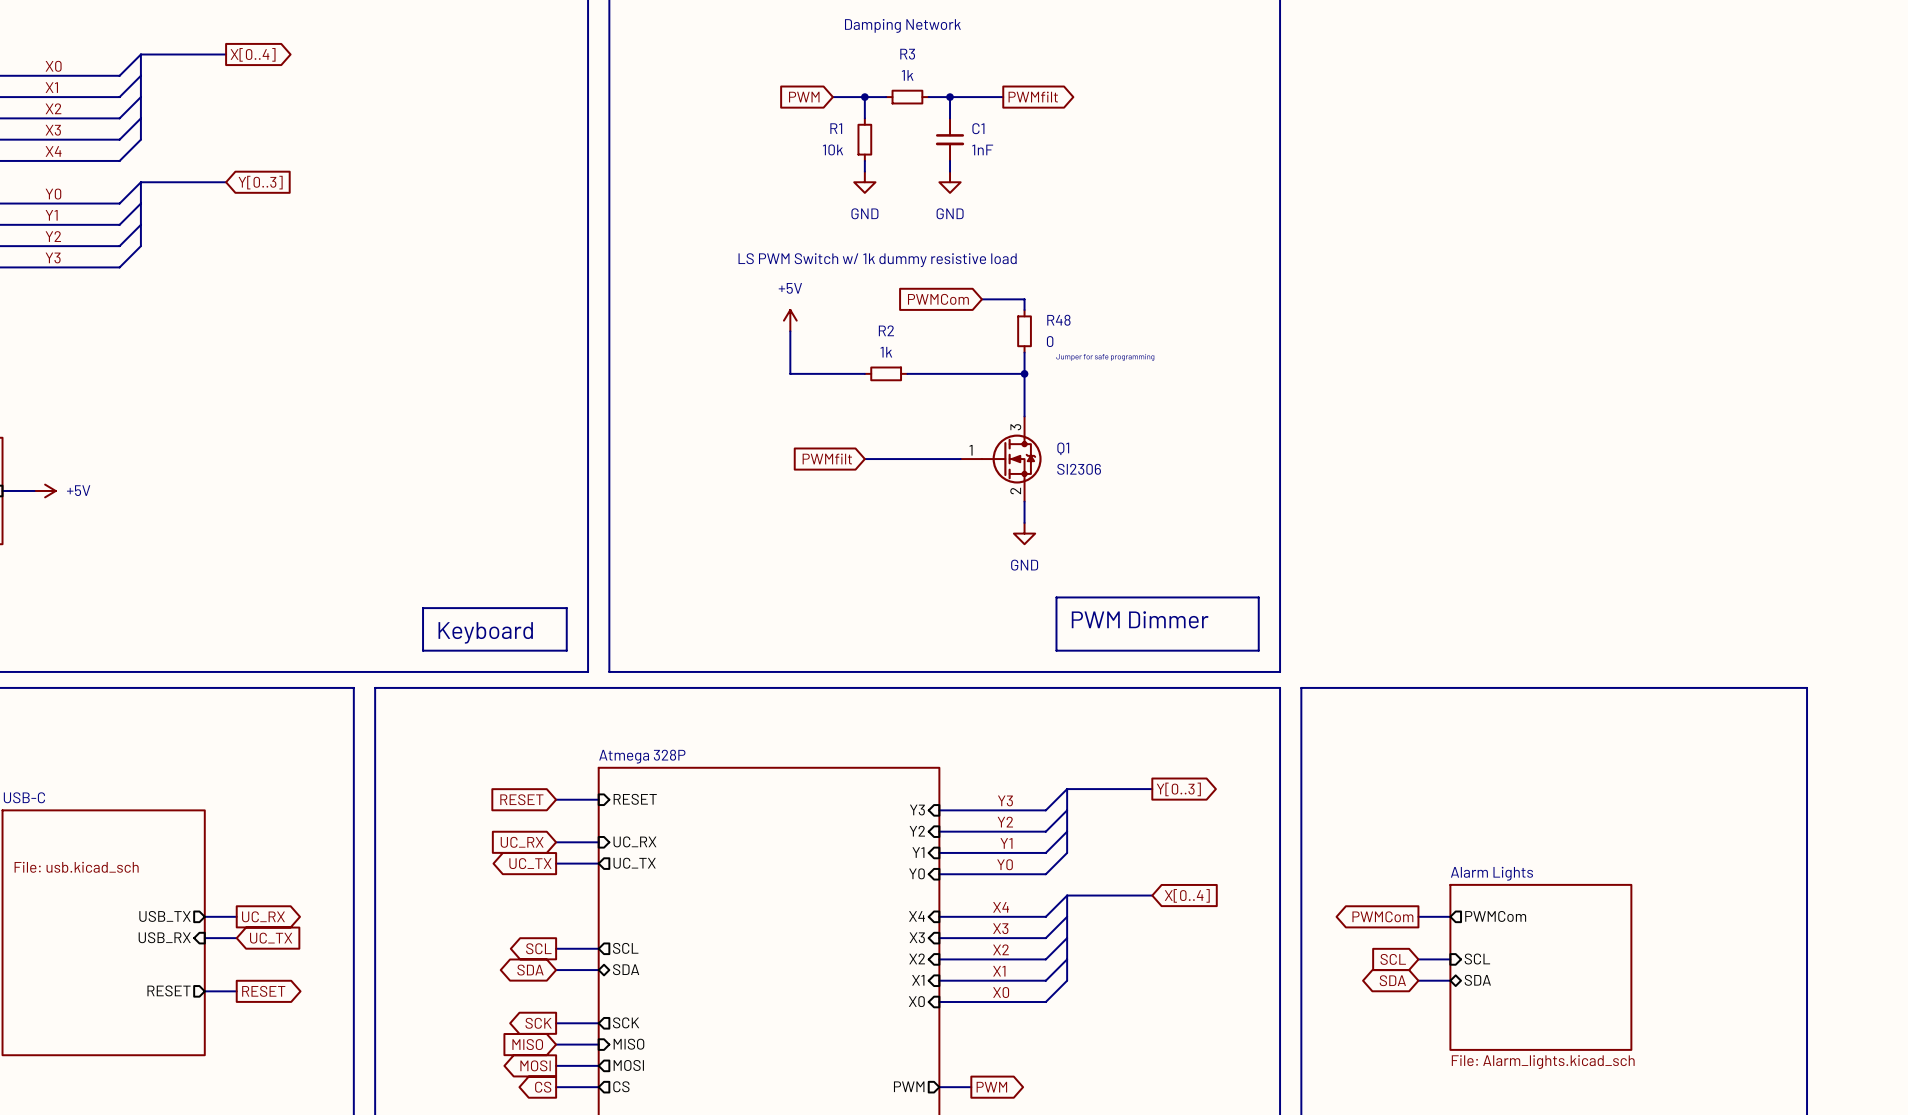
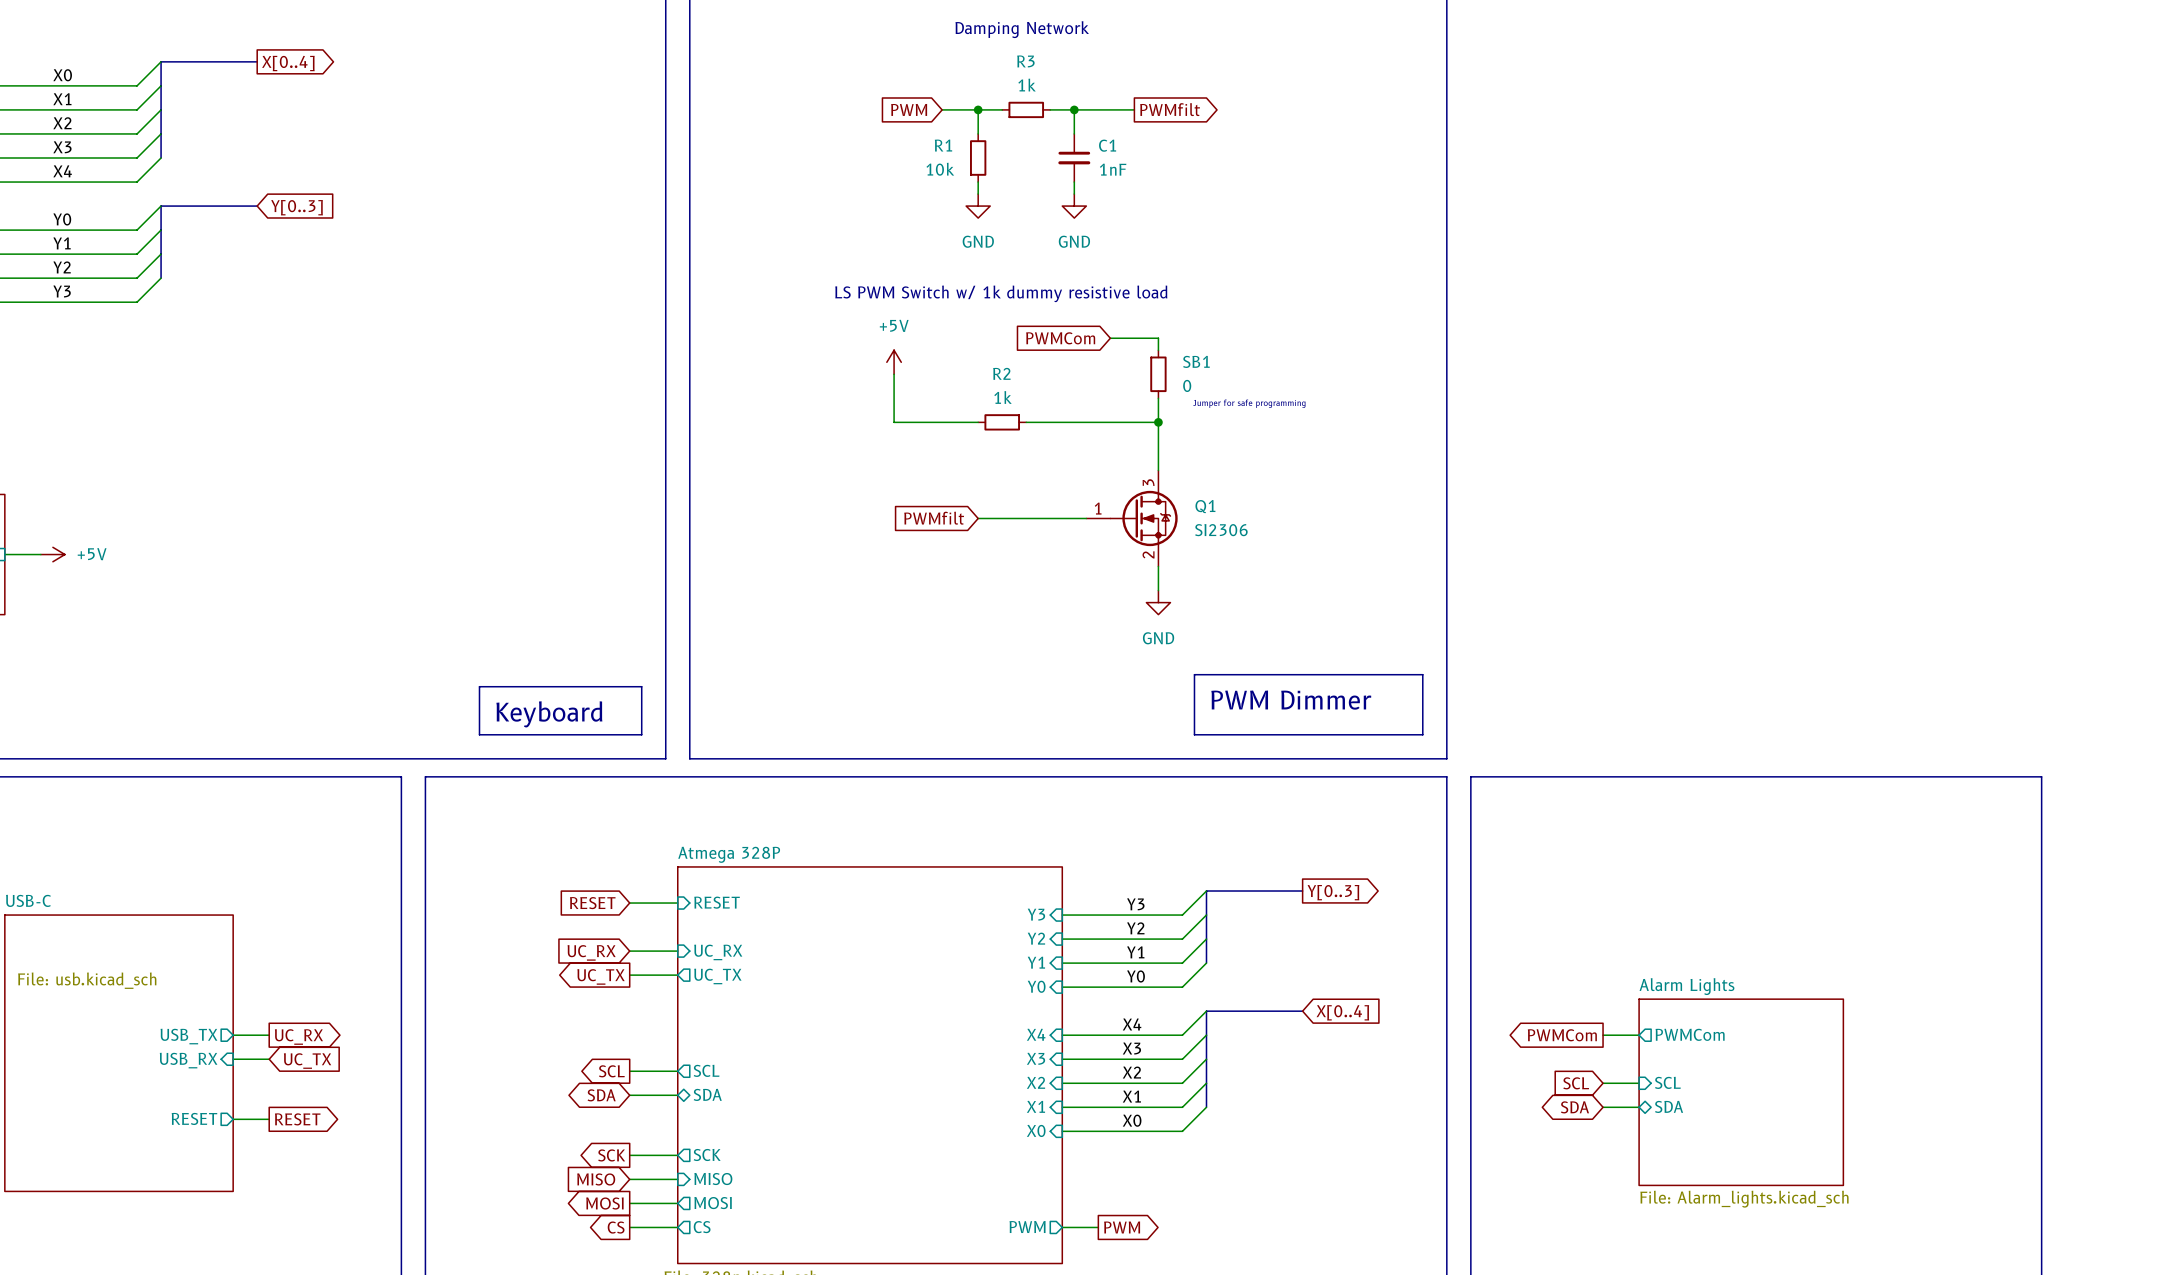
R48 name: R48 (1058, 320) -> SB1 (1196, 361)

